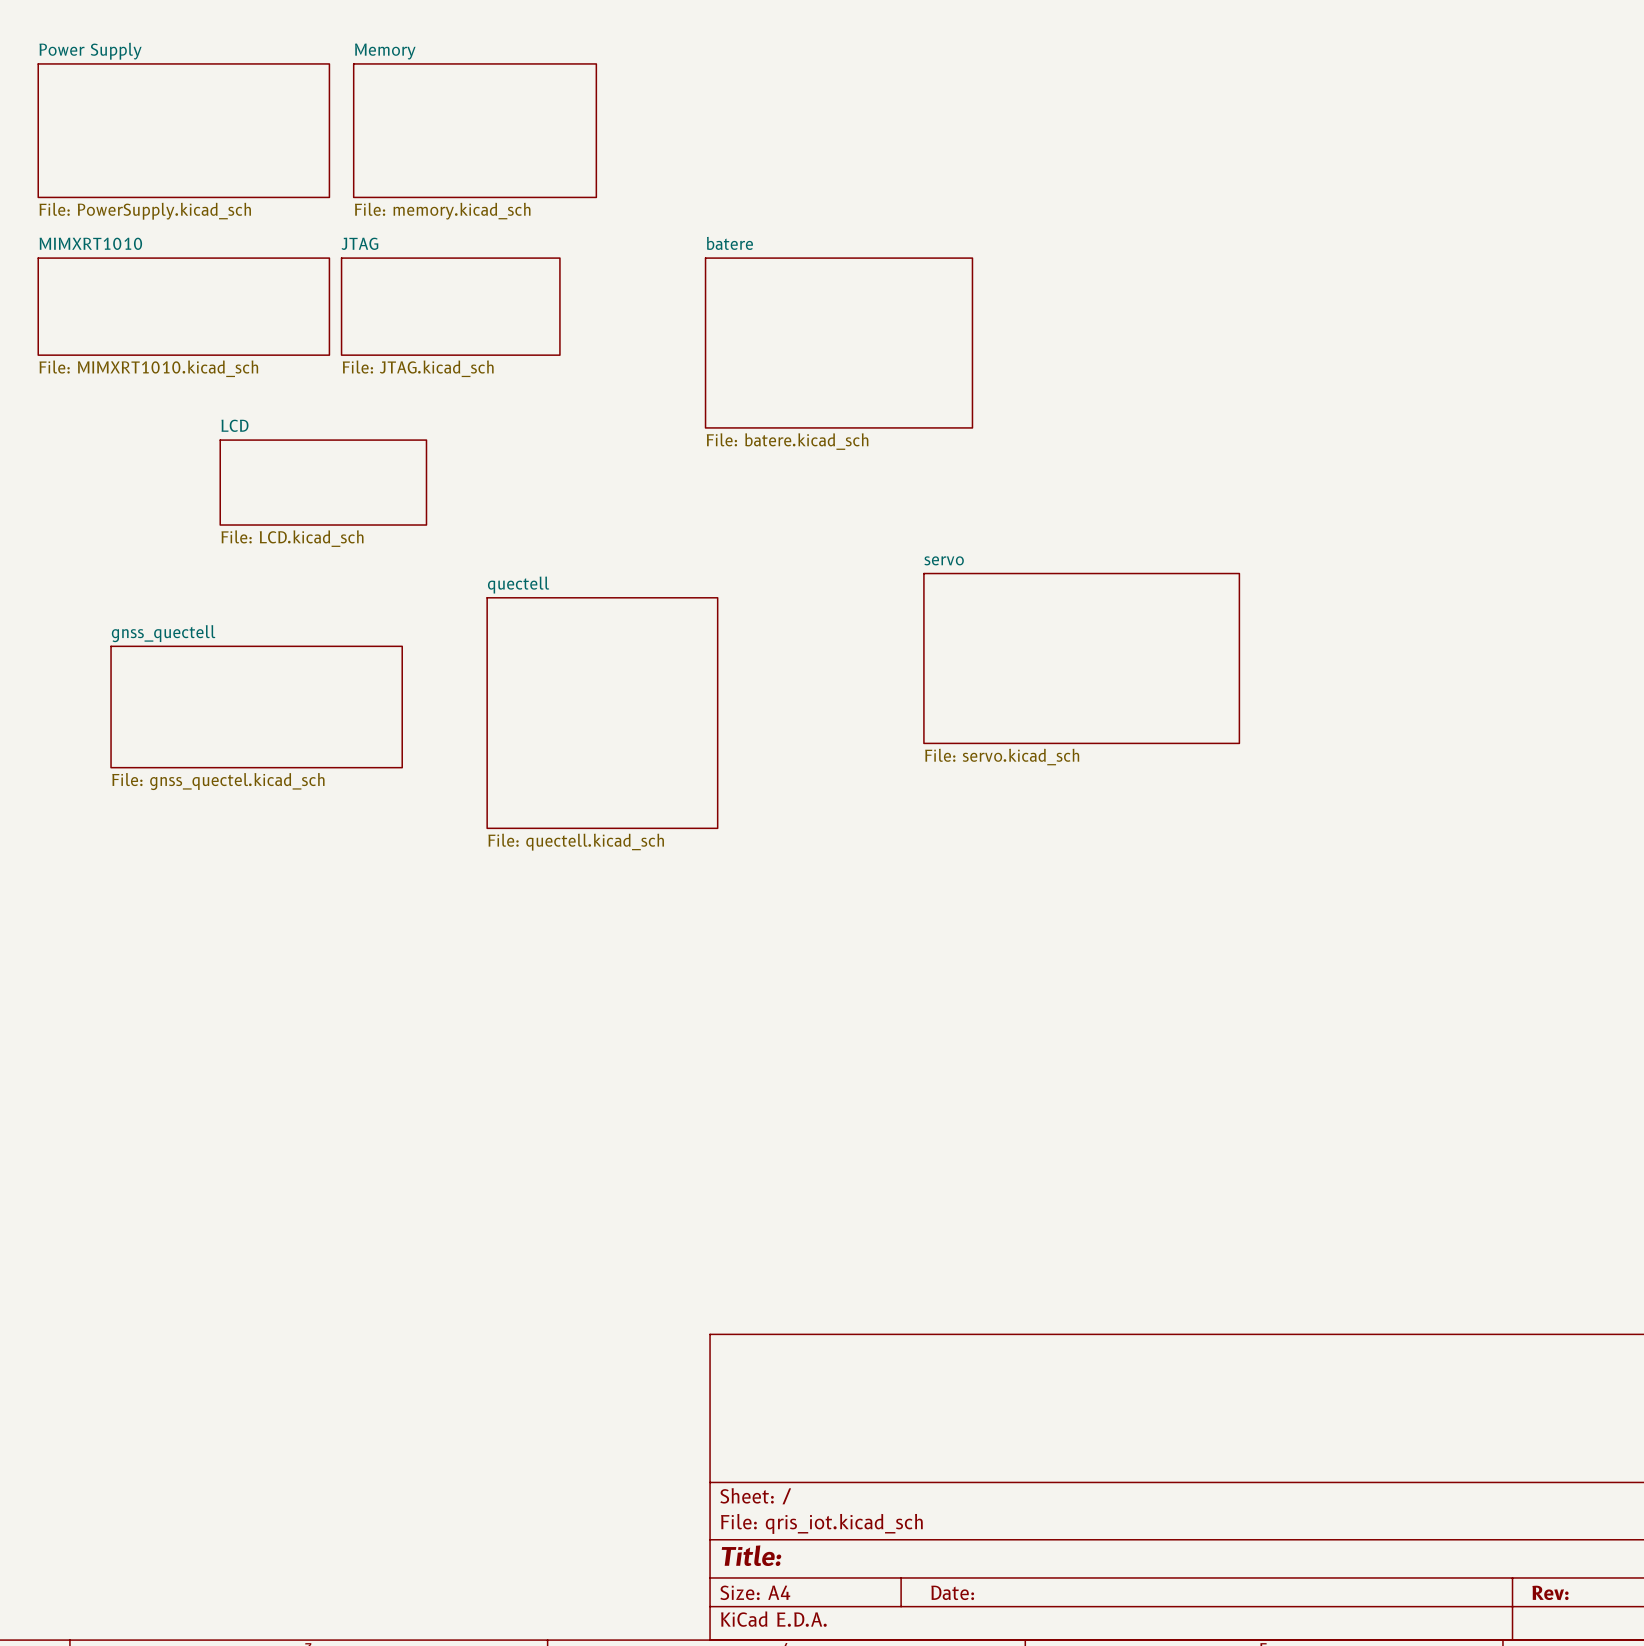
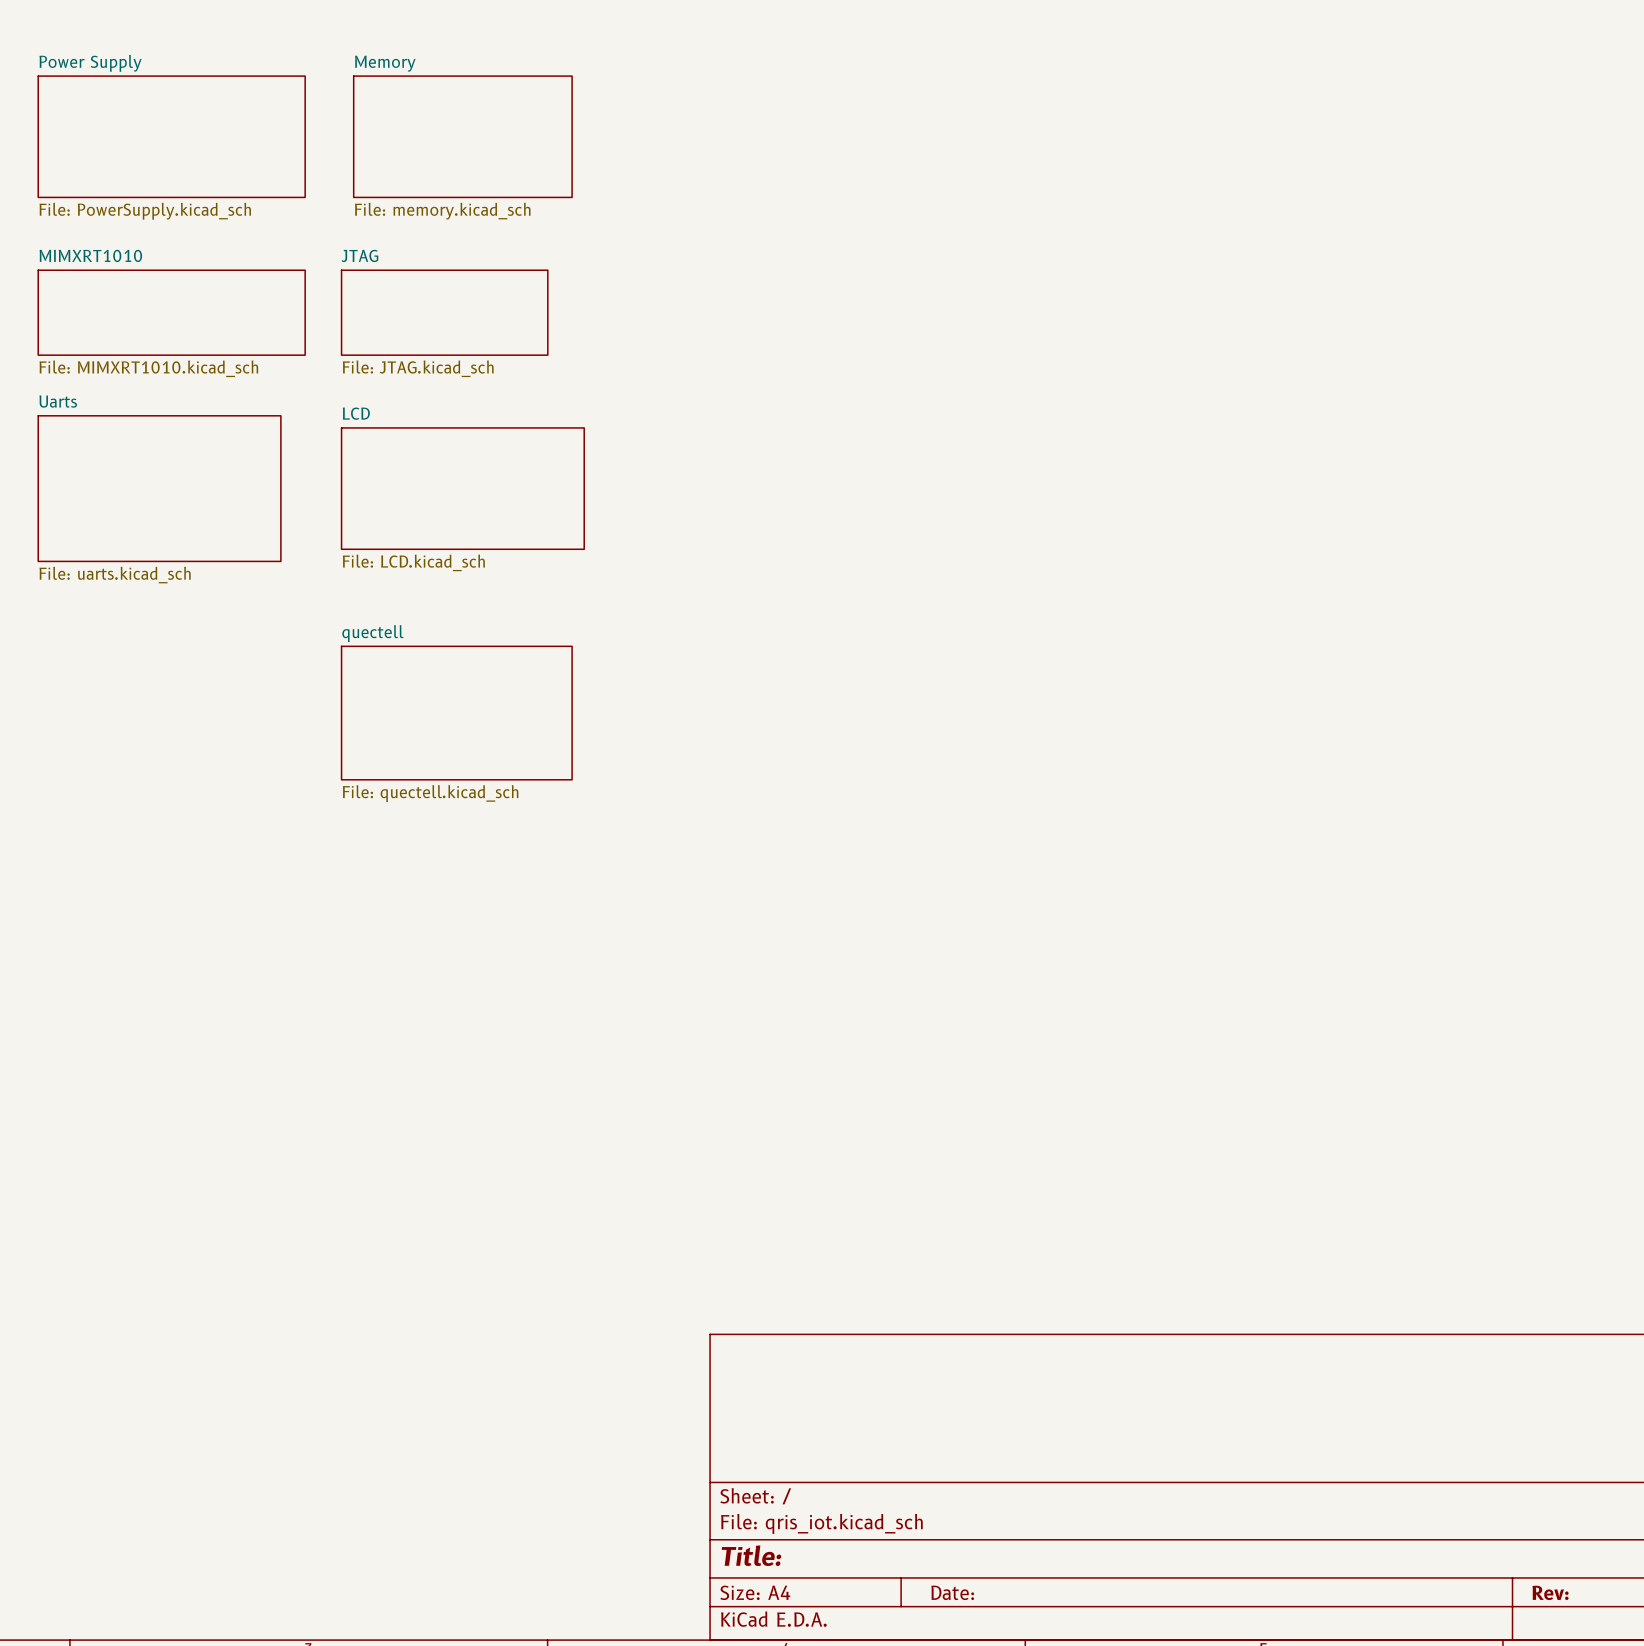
sheet Power Supply: File: PowerSupply.kicad_sch (183, 130) -> none
sheet Memory: File: memory.kicad_sch (475, 130) -> none
sheet Power Supply: none -> File: PowerSupply.kicad_sch (171, 136)
sheet Memory: none -> File: memory.kicad_sch (462, 136)
sheet MIMXRT1010 shape: [37, 257, 331, 356] -> [37, 269, 306, 356]
sheet JTAG shape: [340, 257, 561, 356] -> [340, 269, 549, 356]
sheet batere: File: batere.kicad_sch (839, 343) -> none
sheet LCD: File: LCD.kicad_sch (323, 482) -> none
sheet Uarts: none -> File: uarts.kicad_sch (159, 488)
sheet LCD: none -> File: LCD.kicad_sch (462, 488)
sheet servo: File: servo.kicad_sch (1081, 658) -> none
sheet gnss_quectell: File: gnss_quectel.kicad_sch (256, 707) -> none
sheet quectell: none -> File: quectell.kicad_sch (456, 713)
sheet quectell: File: quectell.kicad_sch (602, 713) -> none

